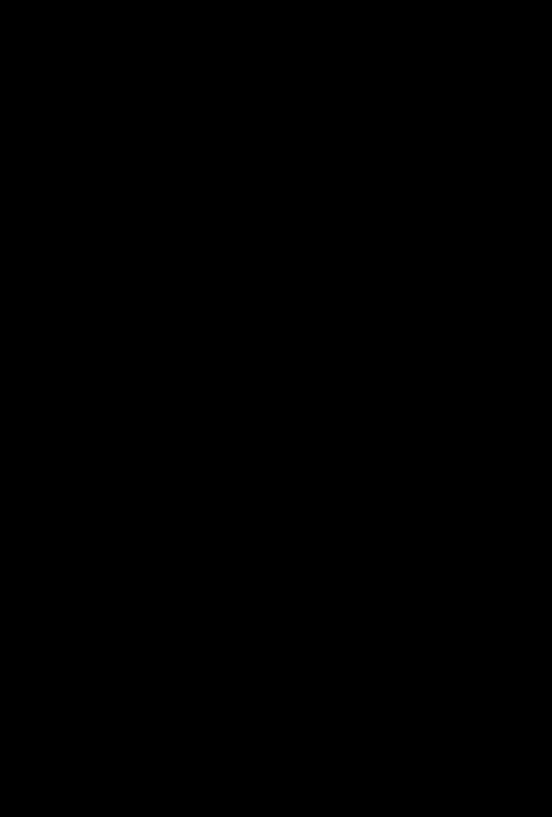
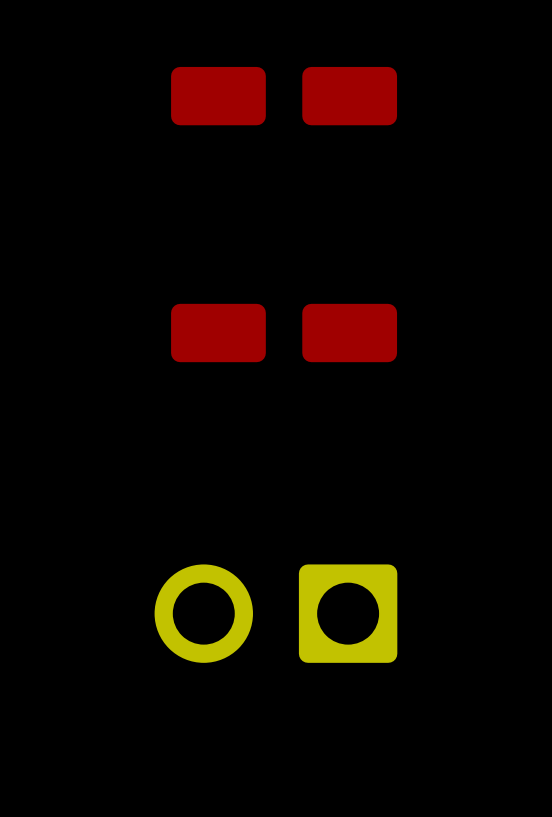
part: none -> (284, 96)
part: none -> (284, 333)
part: none -> (275, 613)

